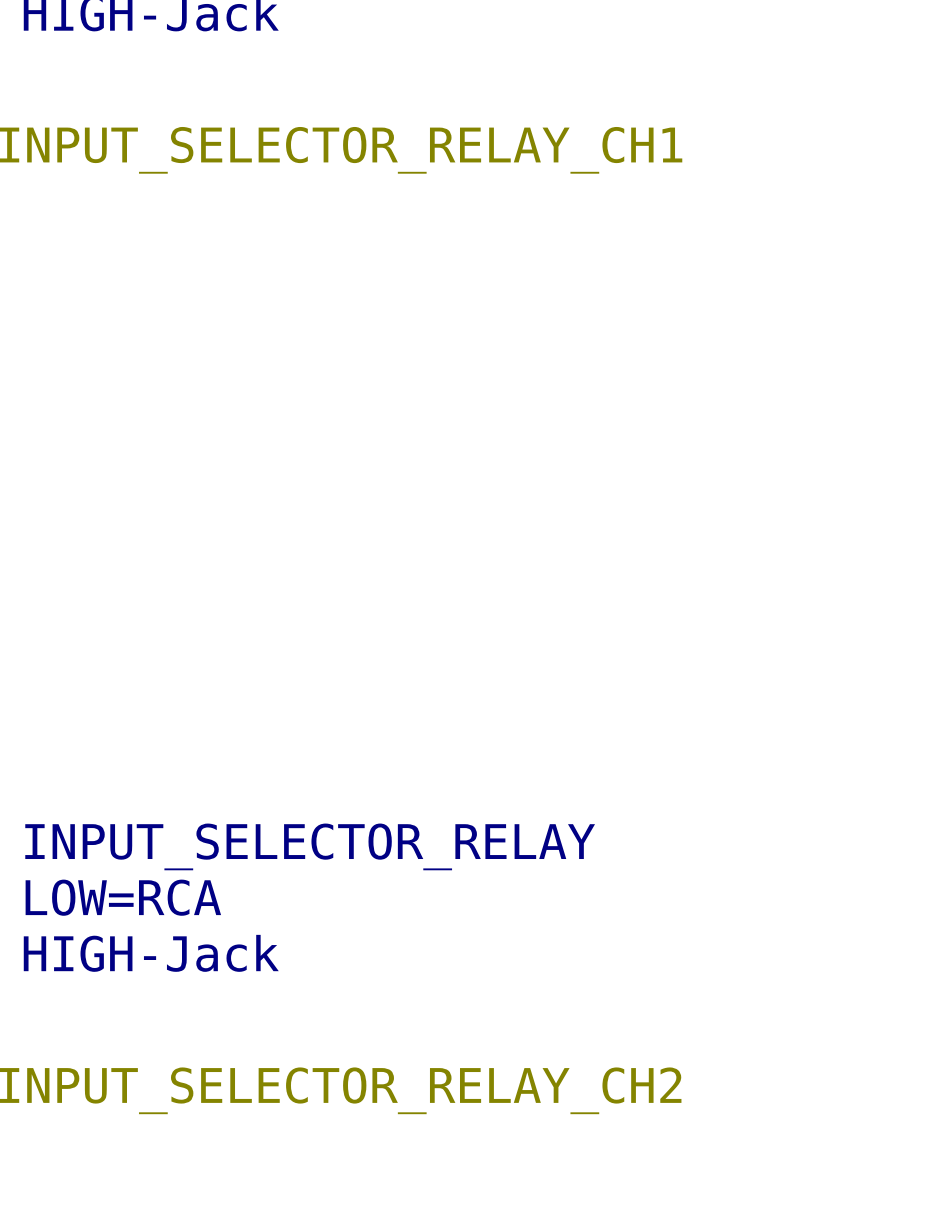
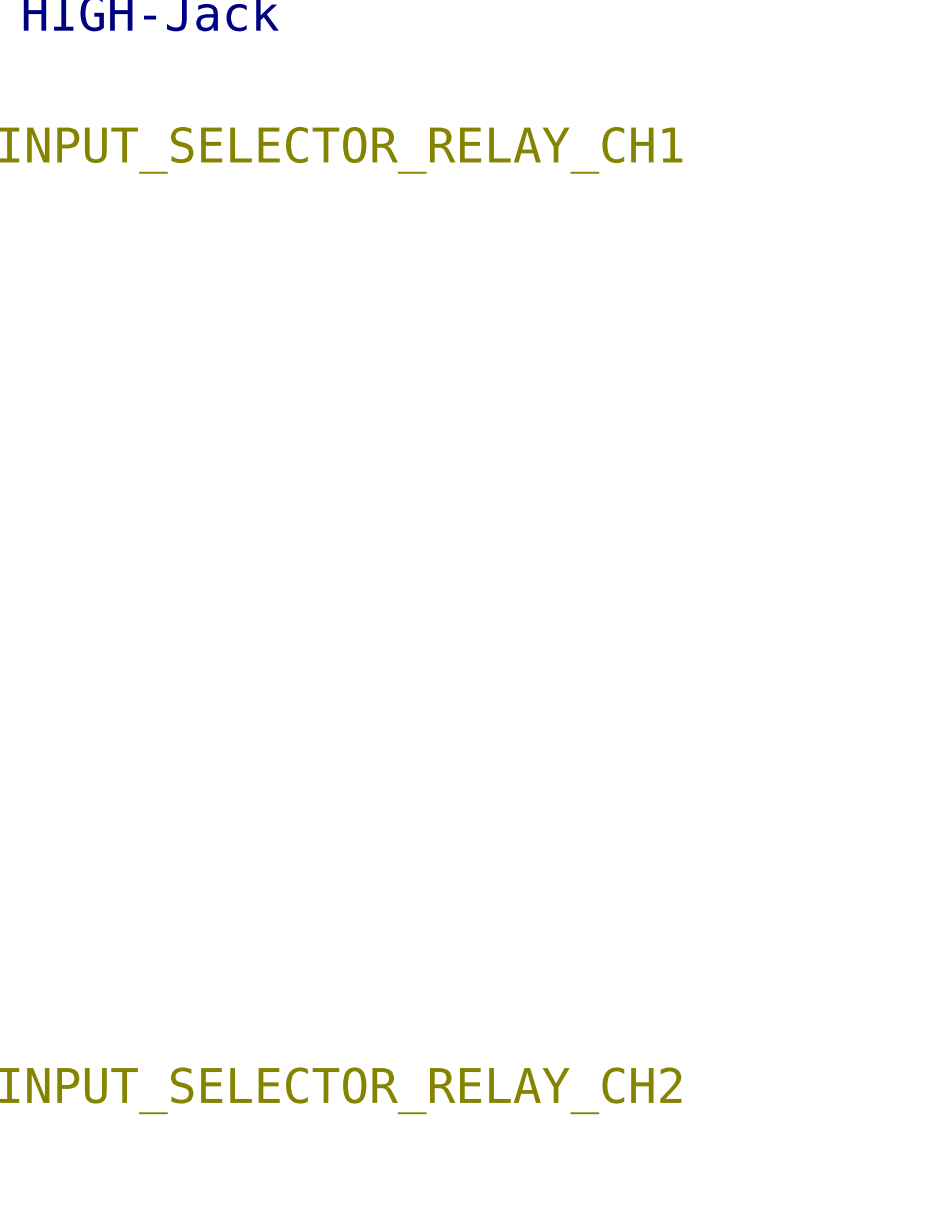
text: INPUT_SELECTOR_RELAY (310, 846) -> none
text: LOW=RCA (123, 897) -> none
text: HIGH-Jack (151, 953) -> none

